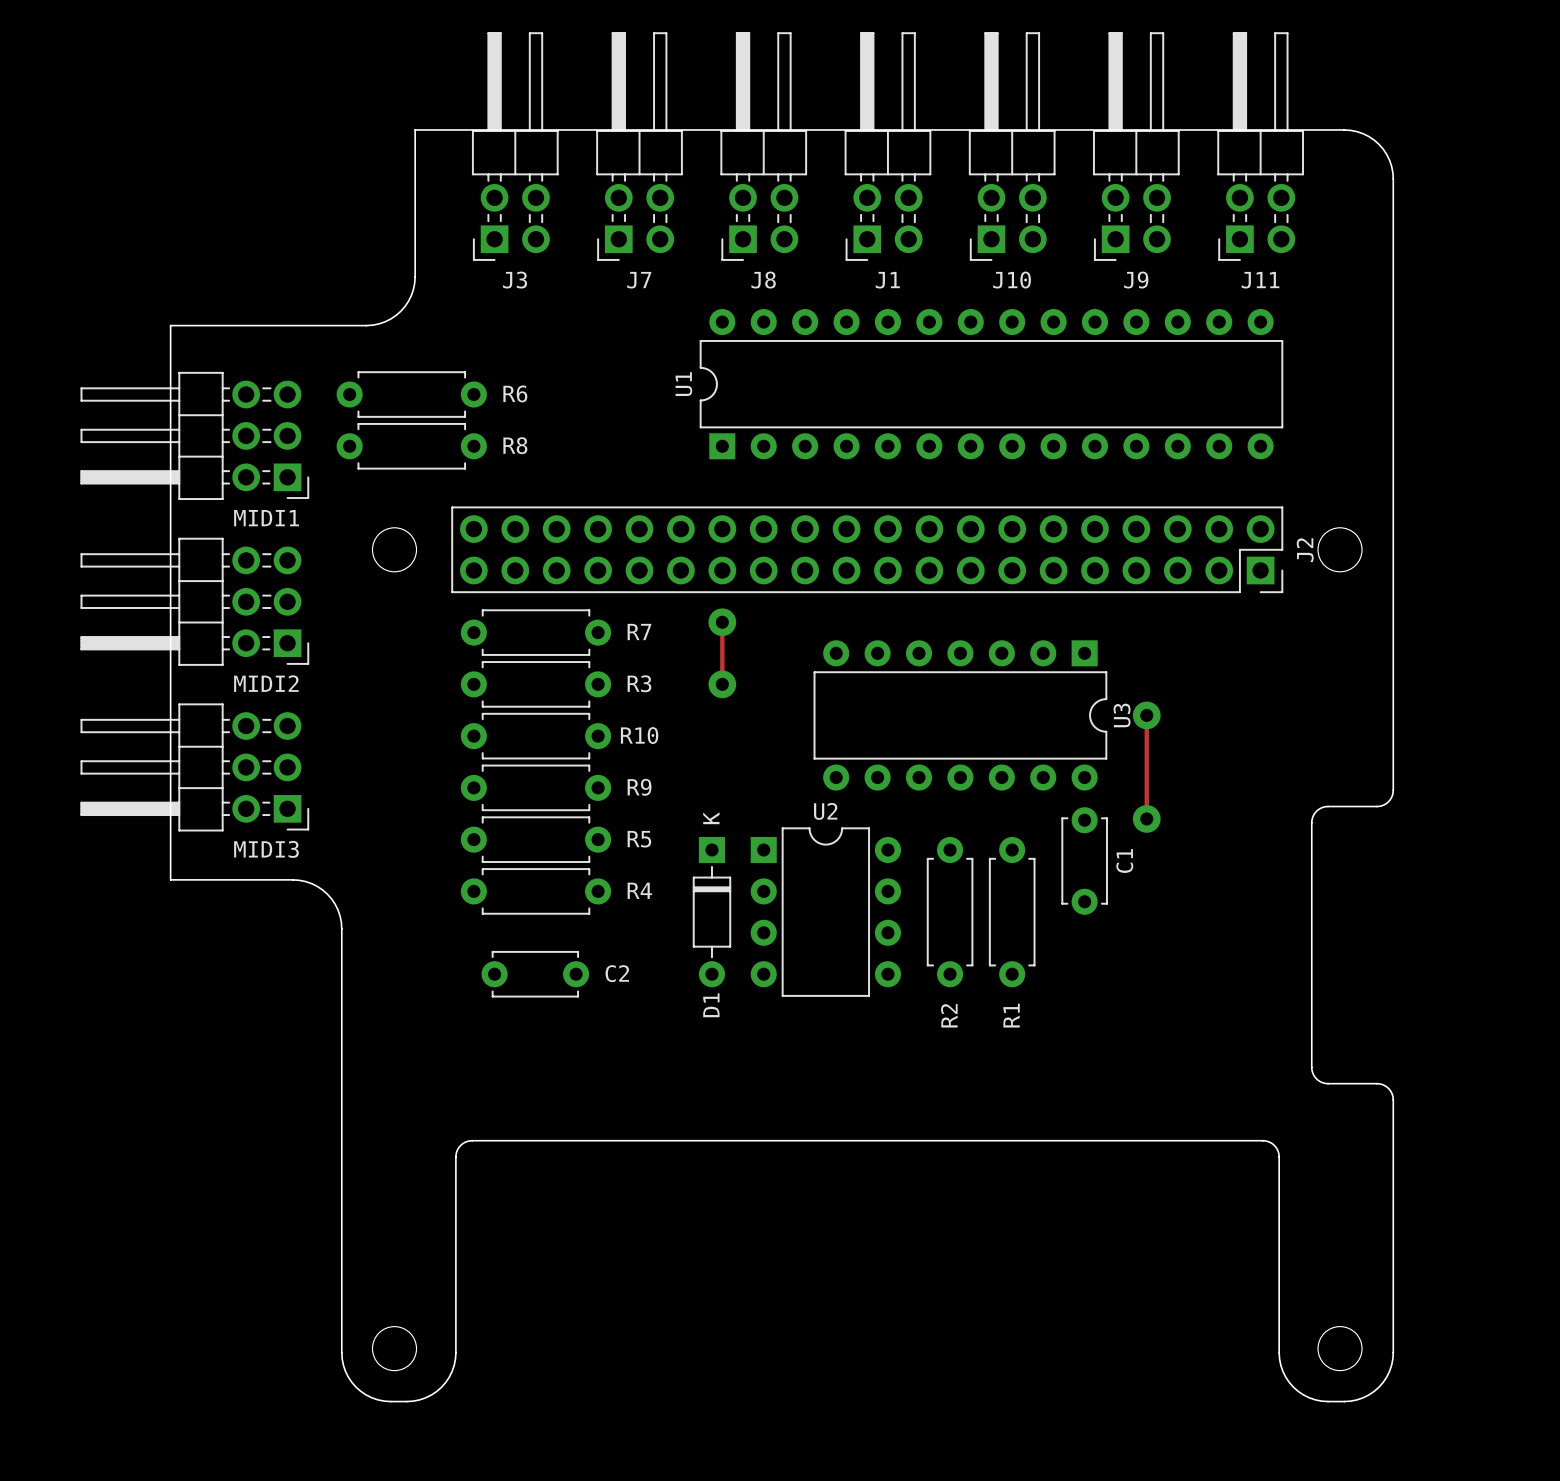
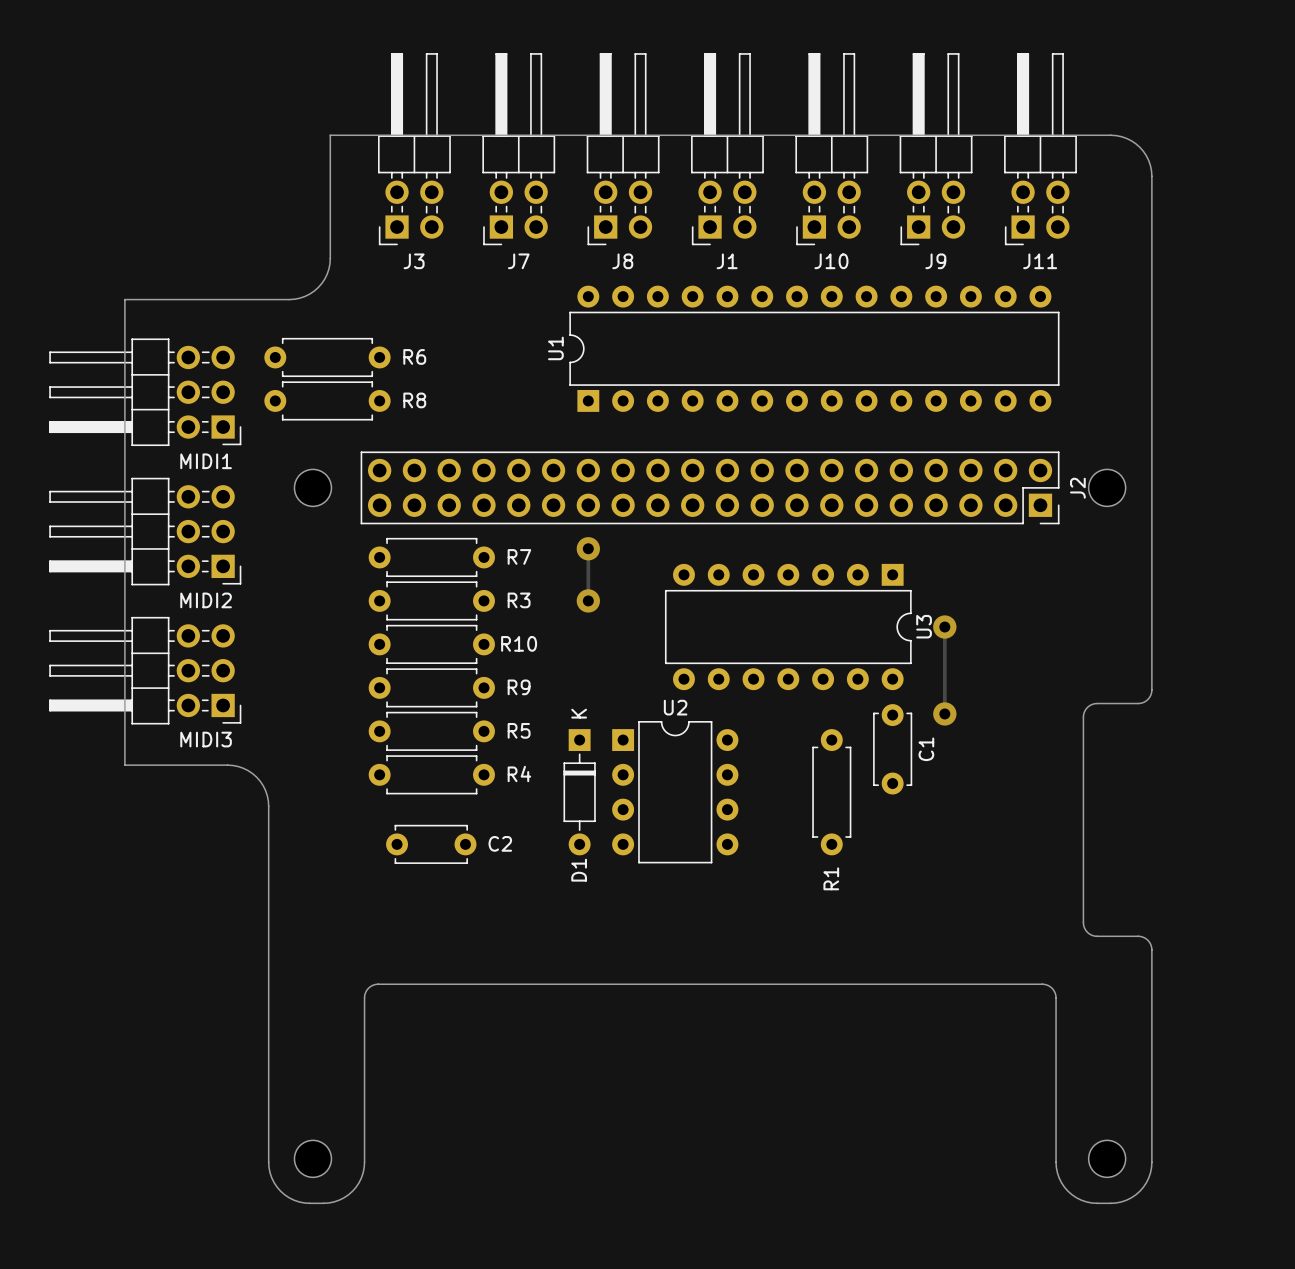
R2: (950, 912) -> none

